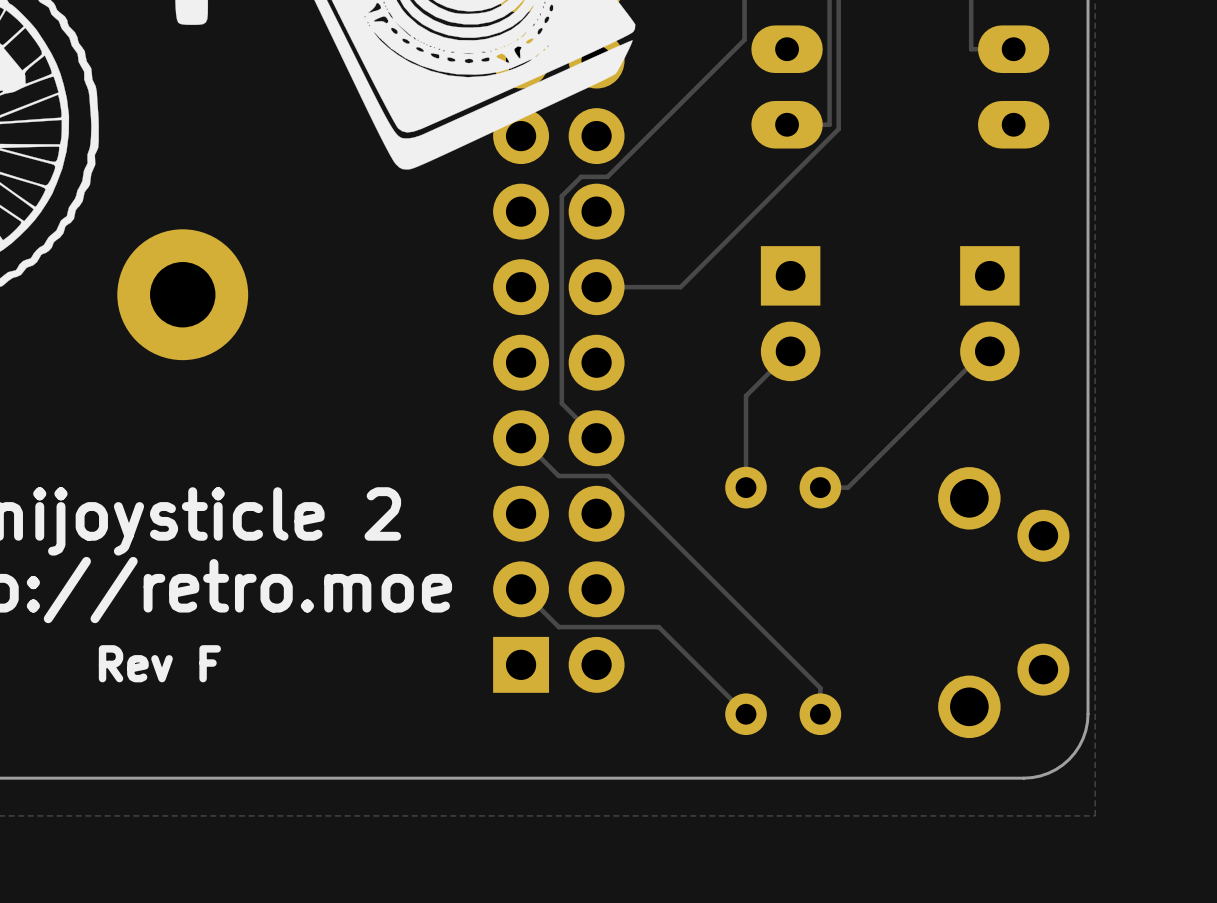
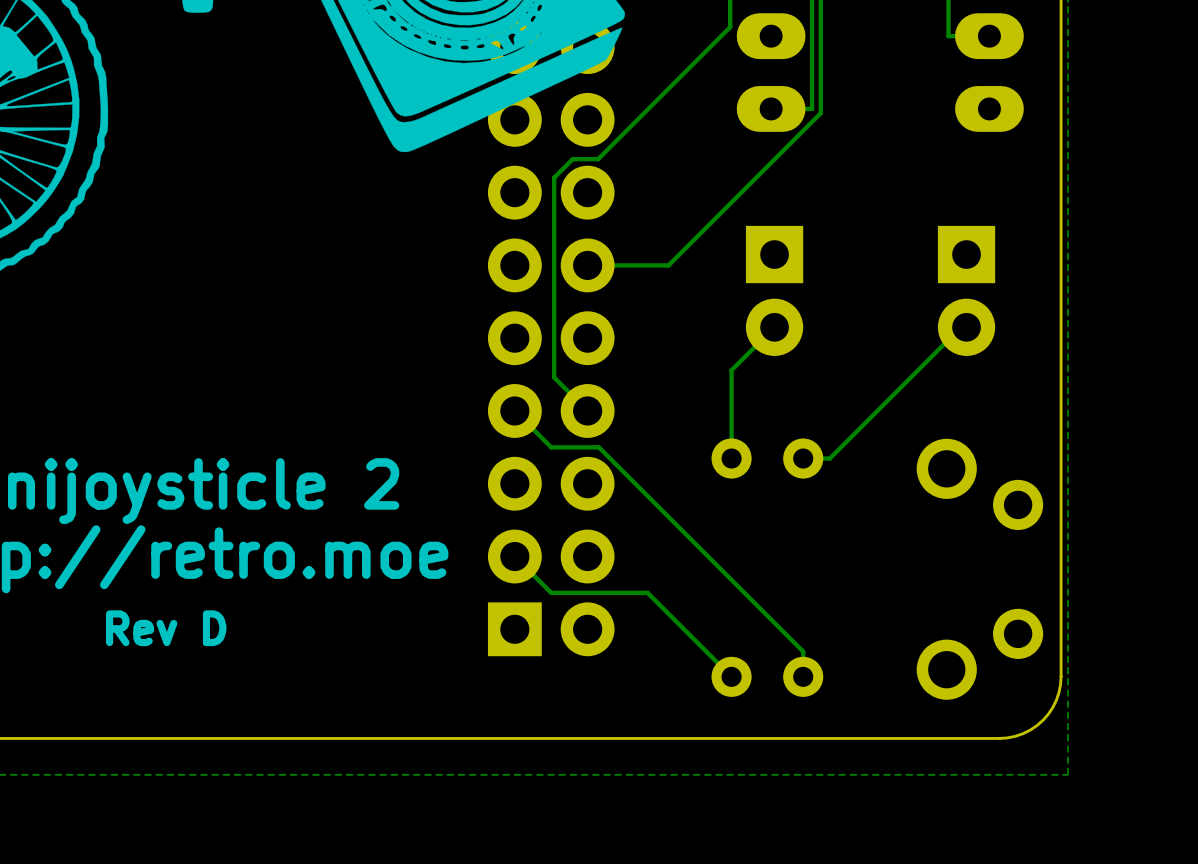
part: (182, 294) -> none
text: Rev F (159, 663) -> Rev D (166, 628)

